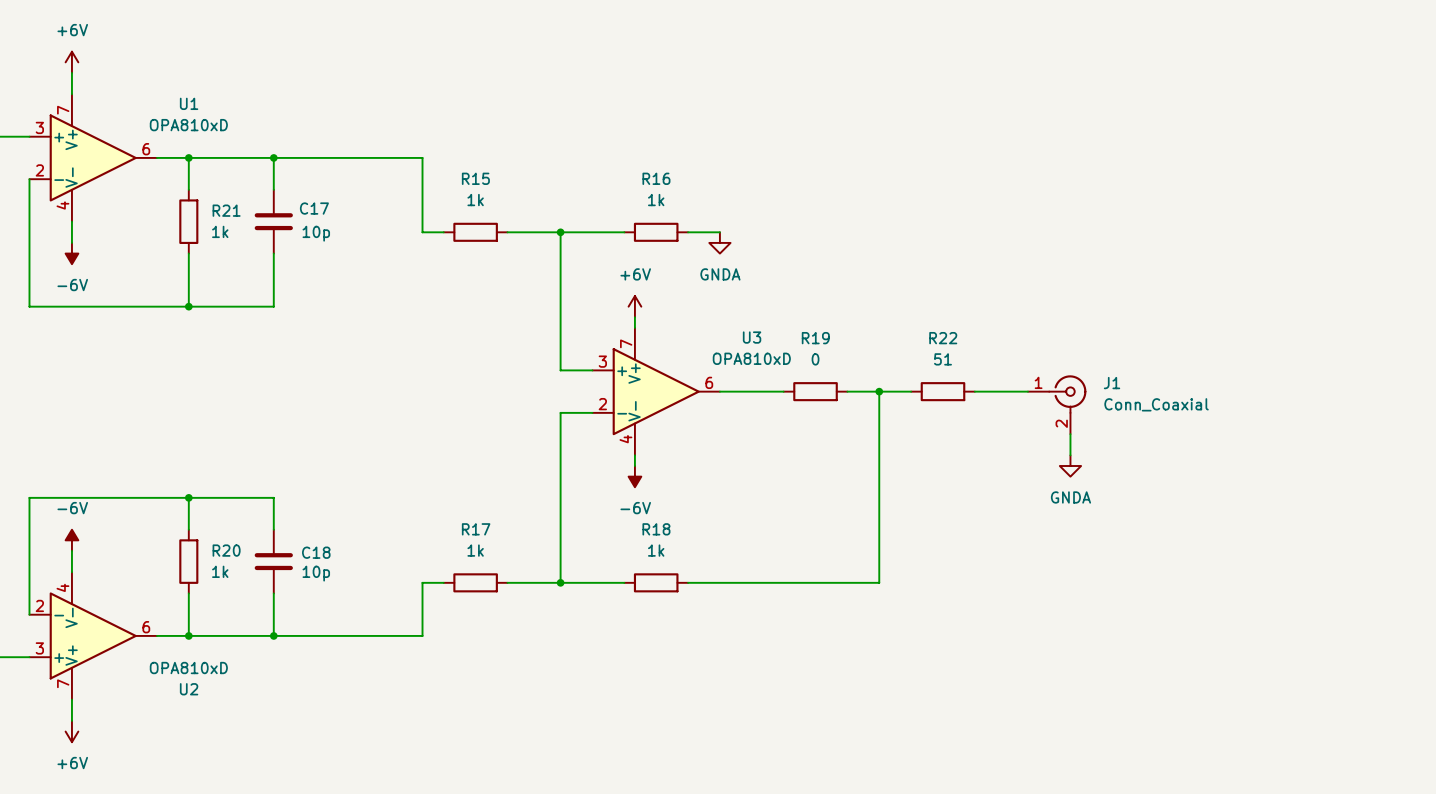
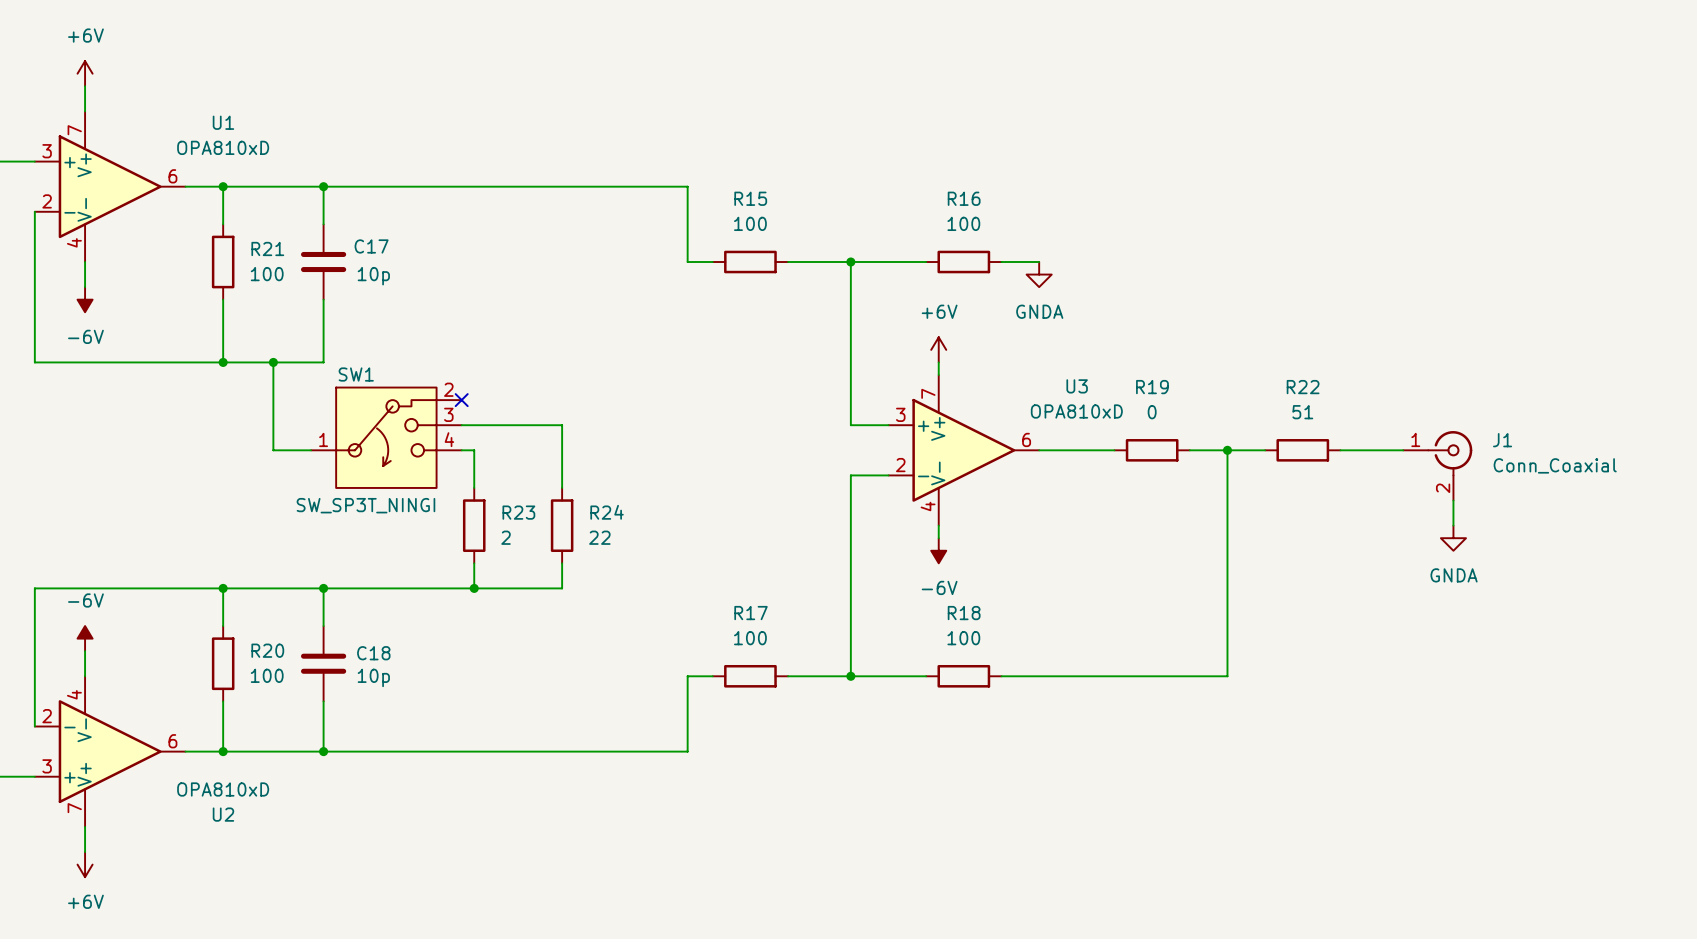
wire: (422, 157) (422, 232) (443, 232) -> (499, 186) (687, 186) (687, 262) (712, 262)
R15 value: 1k (475, 200) -> 100 (750, 223)
R16 value: 1k (656, 200) -> 100 (963, 223)
junction: none -> (850, 262)
R21 value: 1k (220, 231) -> 100 (267, 274)
R15 position: (475, 232) -> (750, 262)
wire: (507, 232) (624, 232) -> (788, 262) (926, 262)
wire: (560, 232) (560, 370) (592, 370) -> (850, 262) (850, 425) (888, 425)
junction: (560, 232) -> none
R16 position: (656, 232) -> (963, 262)
wire: (688, 232) (719, 232) -> (1001, 262) (1039, 262)
power symbol: none -> GNDA (1039, 274)
power symbol: GNDA (719, 242) -> none
wire: none -> (273, 362) (273, 450) (311, 450)
junction: none -> (273, 362)
power symbol position: +6V (634, 306) -> +6V (938, 349)
wire: (634, 317) (634, 327) -> (938, 362) (938, 374)
no-connect mark: none -> (461, 400)
wire: none -> (461, 425) (562, 425) (562, 487)
SW1: none -> SW_SP3T_NINGI (386, 437)
wire: none -> (461, 450) (474, 450) (474, 487)
junction: none -> (1227, 450)
U3 position: (656, 391) -> (963, 450)
wire: (719, 391) (783, 391) -> (1039, 450) (1114, 450)
R19 position: (815, 391) -> (1152, 450)
wire: (847, 391) (911, 391) -> (1189, 450) (1265, 450)
wire: (879, 391) (879, 582) (688, 582) -> (1227, 450) (1227, 676) (1001, 676)
junction: (879, 391) -> none
R22 position: (943, 391) -> (1302, 450)
wire: (974, 391) (1027, 391) -> (1340, 450) (1403, 450)
J1 position: (1057, 404) -> (1437, 465)
wire: (592, 412) (560, 412) (560, 582) -> (888, 475) (850, 475) (850, 676)
wire: (1070, 434) (1070, 455) -> (1453, 500) (1453, 525)
R23: none -> 2 (474, 525)
R24: none -> 22 (562, 525)
wire: (634, 455) (634, 466) -> (938, 525) (938, 538)
power symbol: none -> GNDA (1453, 538)
power symbol: GNDA (1070, 466) -> none
wire: none -> (474, 563) (474, 588)
wire: none -> (562, 563) (562, 588) (323, 588)
power symbol position: -6V (634, 476) -> -6V (938, 550)
junction: none -> (323, 588)
junction: none -> (474, 588)
R17 value: 1k (475, 550) -> 100 (750, 638)
R18 value: 1k (656, 550) -> 100 (963, 638)
R20 value: 1k (220, 571) -> 100 (267, 675)
junction: none -> (850, 676)
wire: (443, 582) (422, 582) (422, 635) -> (712, 676) (687, 676) (687, 751) (499, 751)
R17 position: (475, 582) -> (750, 676)
wire: (507, 582) (624, 582) -> (788, 676) (926, 676)
junction: (560, 582) -> none
R18 position: (656, 582) -> (963, 676)

